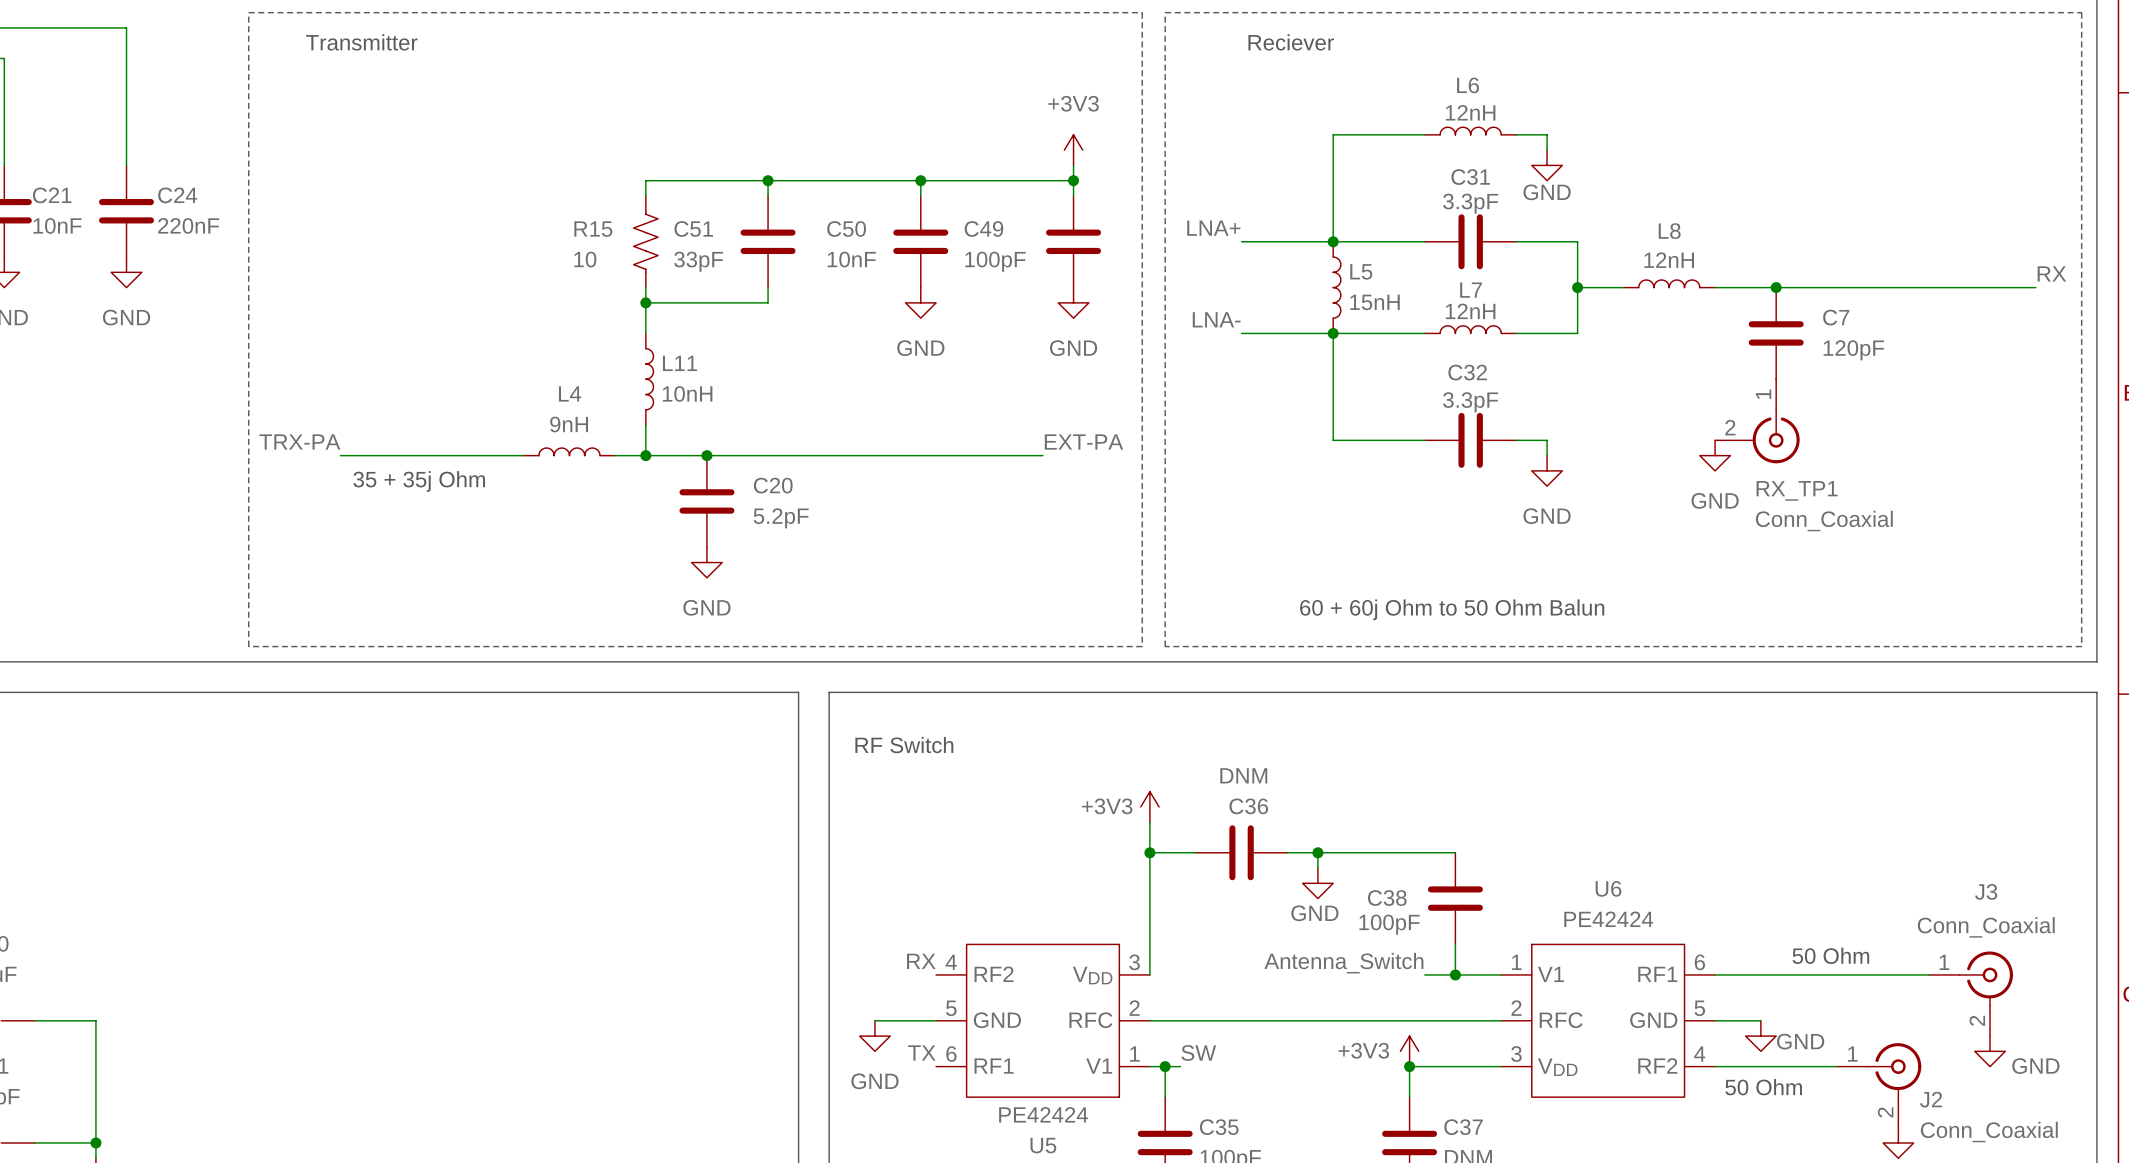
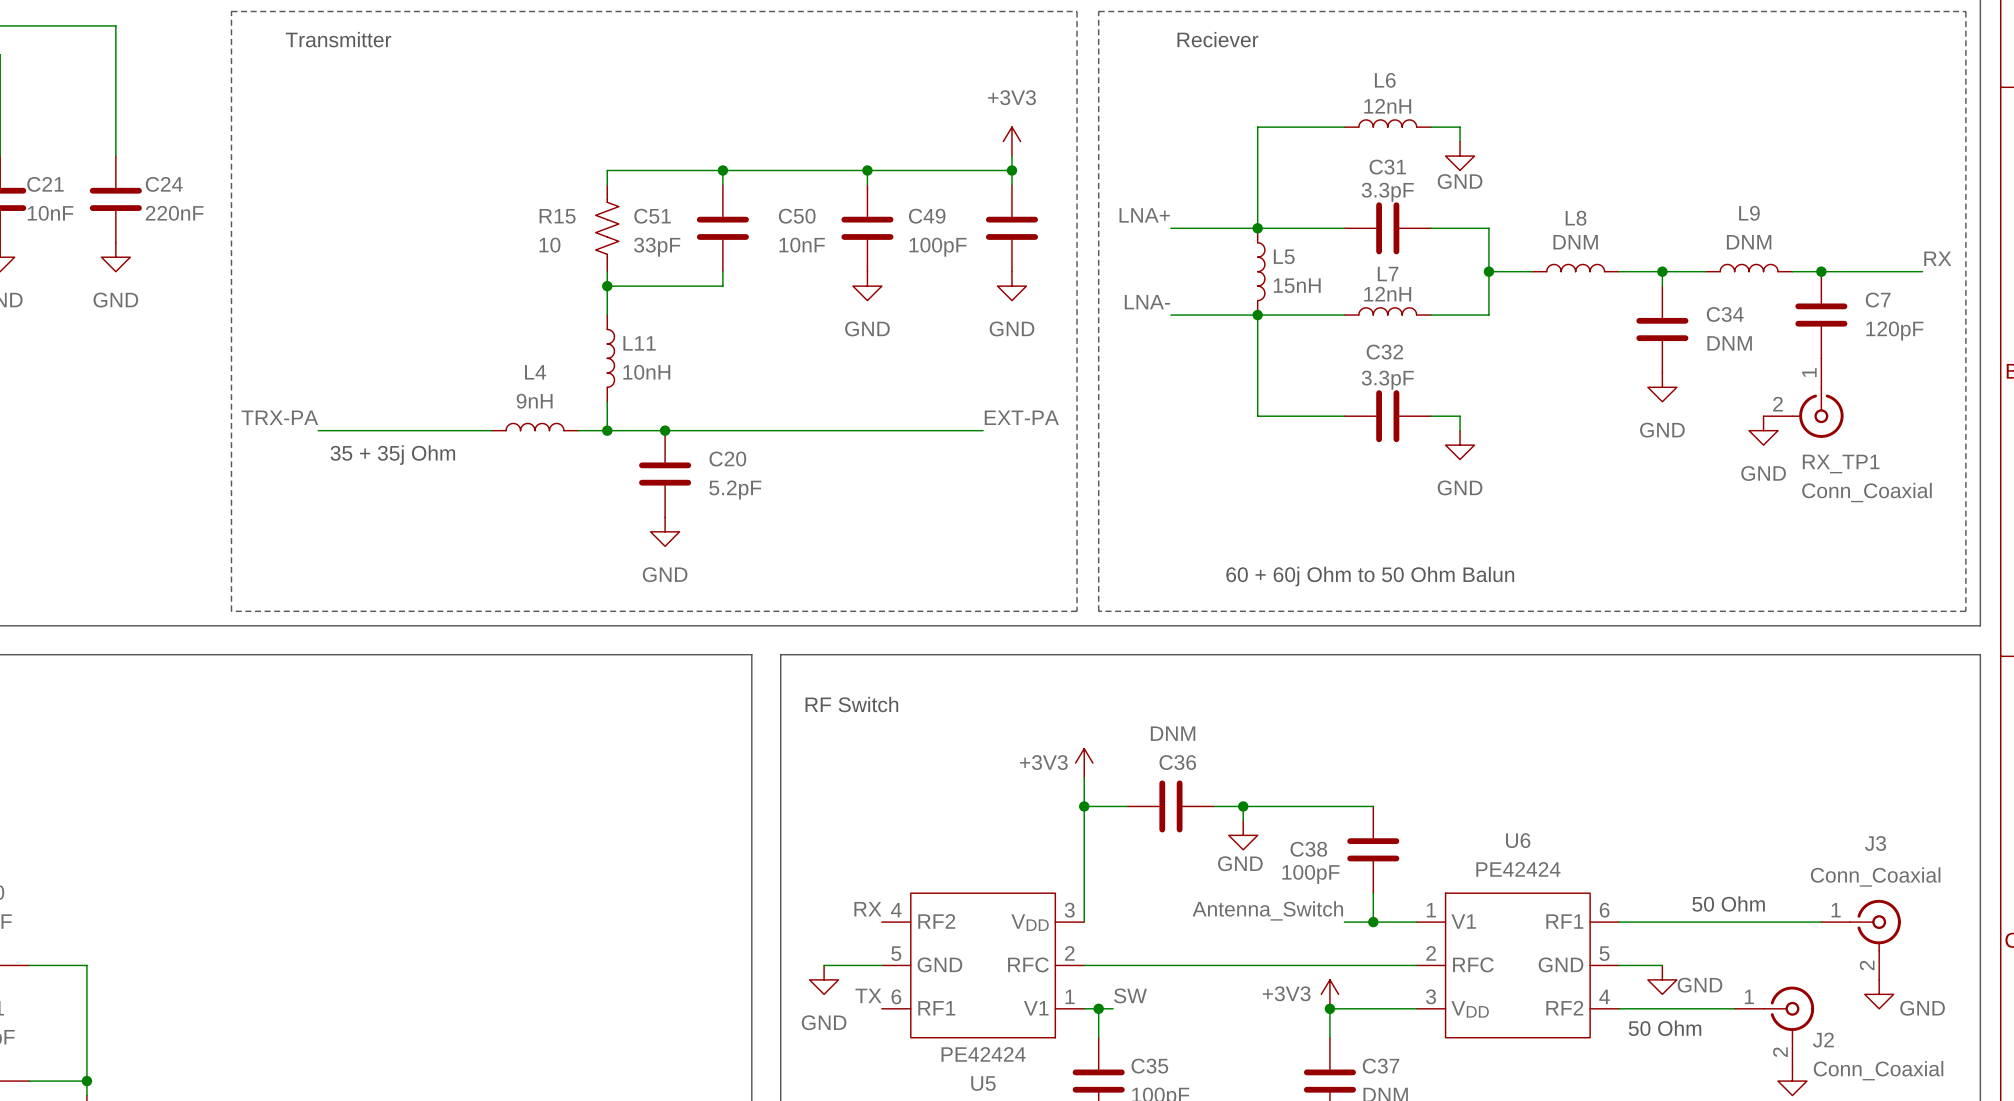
L8 value: 12nH (1669, 260) -> DNM (1575, 242)
L9: none -> DNM (1749, 268)
wire: none -> (1662, 271) (1662, 286)
junction position: (1776, 287) -> (1662, 271)
wire: (1806, 287) (1898, 287) -> none
junction: none -> (1821, 271)
C7 position: (1776, 333) -> (1821, 315)
C34: none -> DNM (1662, 329)
RX_TP1 position: (1757, 421) -> (1803, 398)
power symbol position: GND (1715, 455) -> GND (1662, 387)
power symbol: none -> GND (1763, 430)

